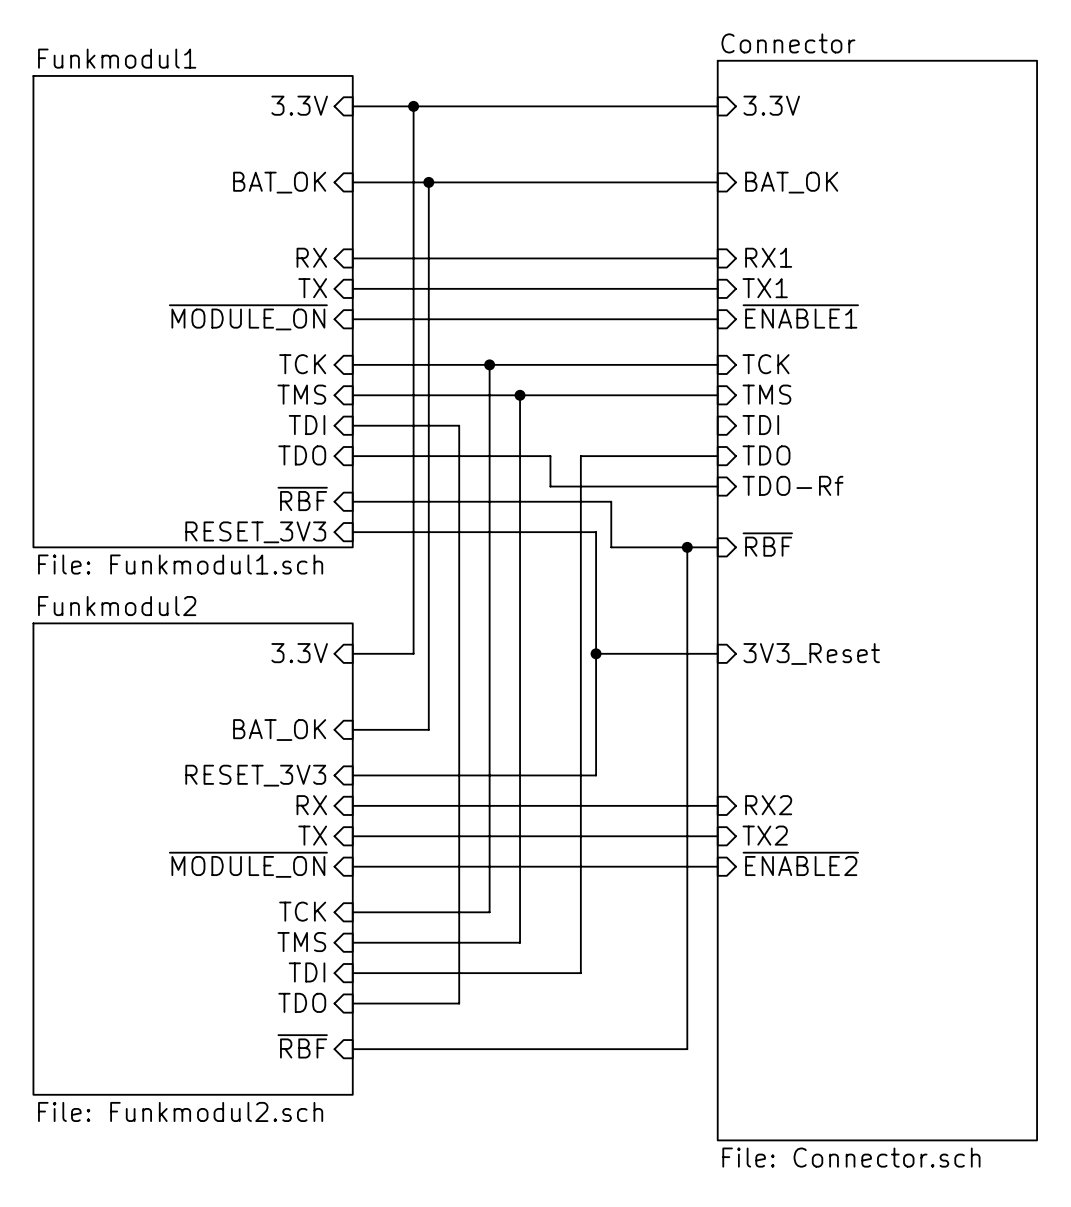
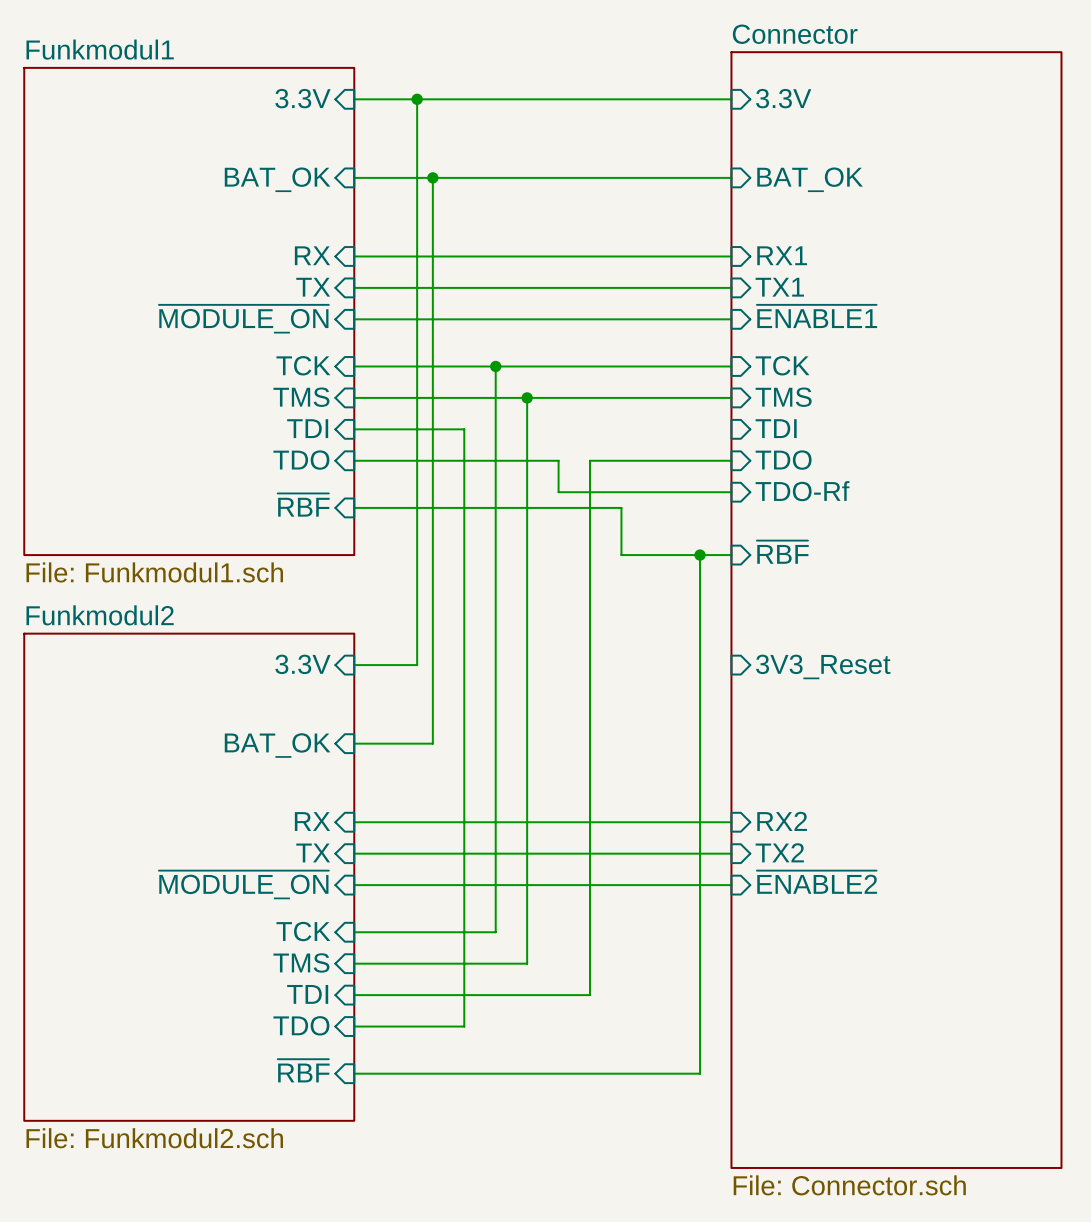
sheet pin: RESET_3V3 (255, 532) -> none
wire: (352, 532) (596, 532) (596, 775) (352, 775) -> none
wire: (596, 653) (717, 653) -> none
junction: (596, 653) -> none
sheet pin: RESET_3V3 (255, 775) -> none

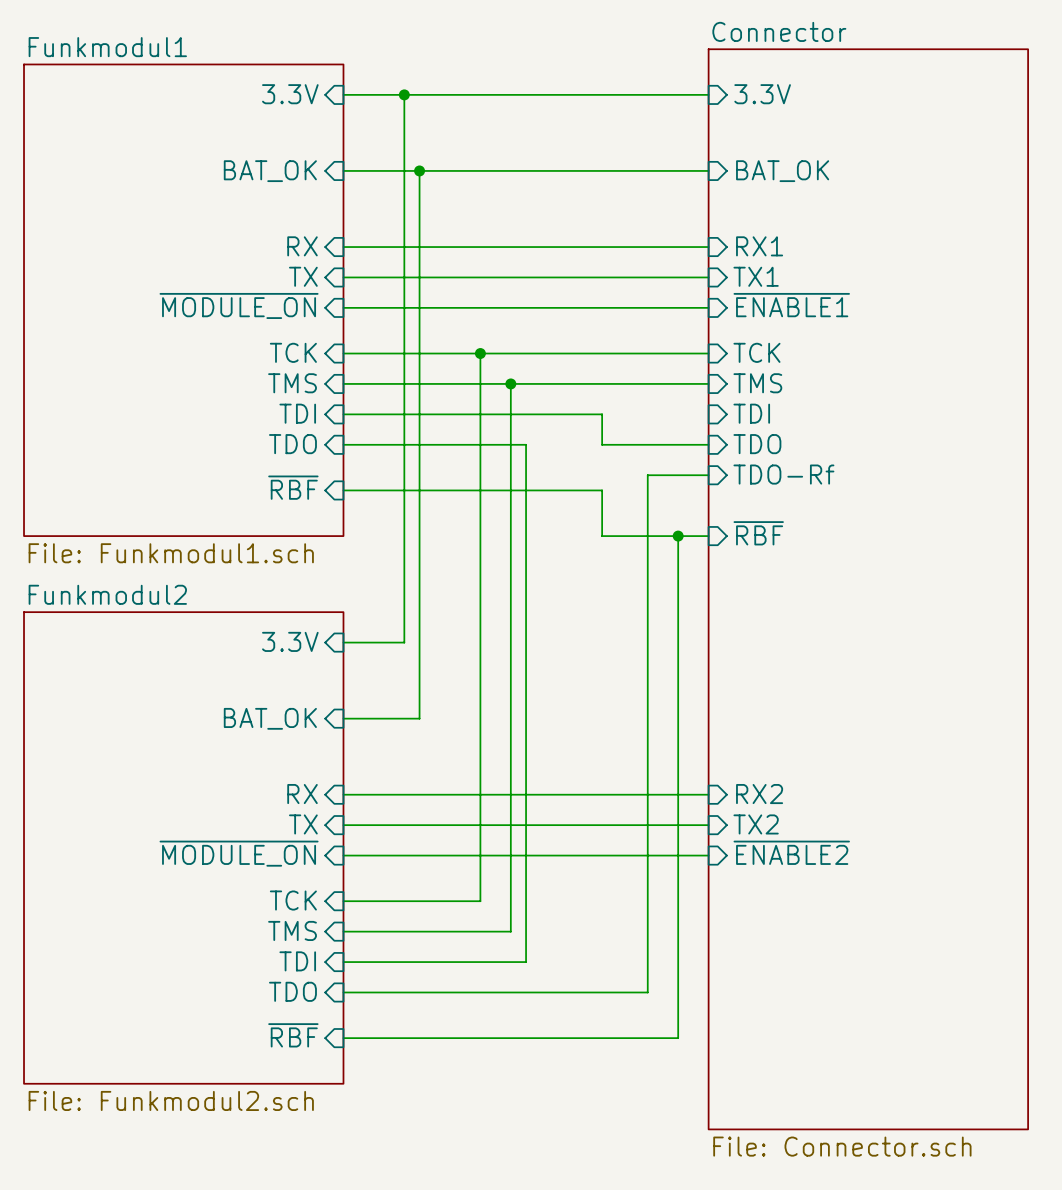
wire: (464, 429) (464, 1026) -> (647, 475) (647, 992) (449, 992)
wire: none -> (449, 414) (602, 414) (602, 444)
wire: (542, 460) (558, 460) (558, 492) (668, 492) -> none
wire: (621, 460) (590, 460) (590, 995) (542, 995) -> (526, 444) (526, 962)
sheet pin: 3V3_Reset (823, 666) -> none

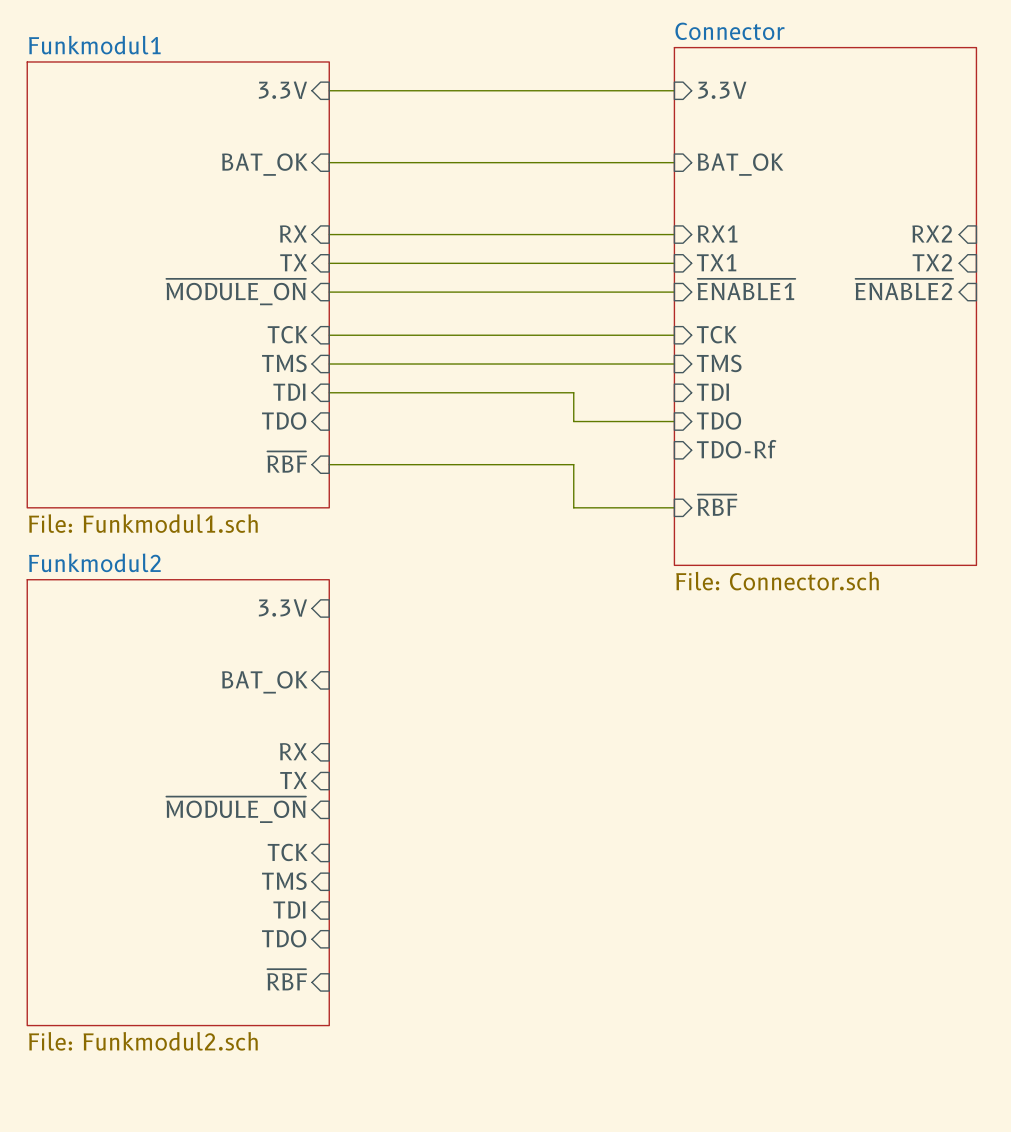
wire: (404, 94) (404, 642) (343, 642) -> none
junction: (404, 94) -> none
wire: (419, 170) (419, 718) (343, 718) -> none
junction: (419, 170) -> none
sheet pin: none -> RX2 (932, 233)
sheet pin: none -> TX2 (932, 262)
sheet pin: none -> ~{ENABLE2} (904, 289)
sheet Connector: none -> File: Connector.sch (825, 306)
wire: (480, 353) (480, 901) (343, 901) -> none
junction: (480, 353) -> none
wire: (510, 383) (510, 931) (343, 931) -> none
junction: (510, 383) -> none
wire: (343, 444) (526, 444) (526, 962) (343, 962) -> none
wire: (708, 475) (647, 475) (647, 992) (343, 992) -> none
wire: (678, 536) (678, 1038) (343, 1038) -> none
junction: (678, 536) -> none
sheet Connector: File: Connector.sch (868, 589) -> none
wire: (343, 794) (708, 794) -> none
sheet pin: RX2 (759, 794) -> none
sheet pin: TX2 (756, 824) -> none
wire: (343, 825) (708, 825) -> none
sheet pin: ~{ENABLE2} (791, 852) -> none
wire: (343, 855) (708, 855) -> none

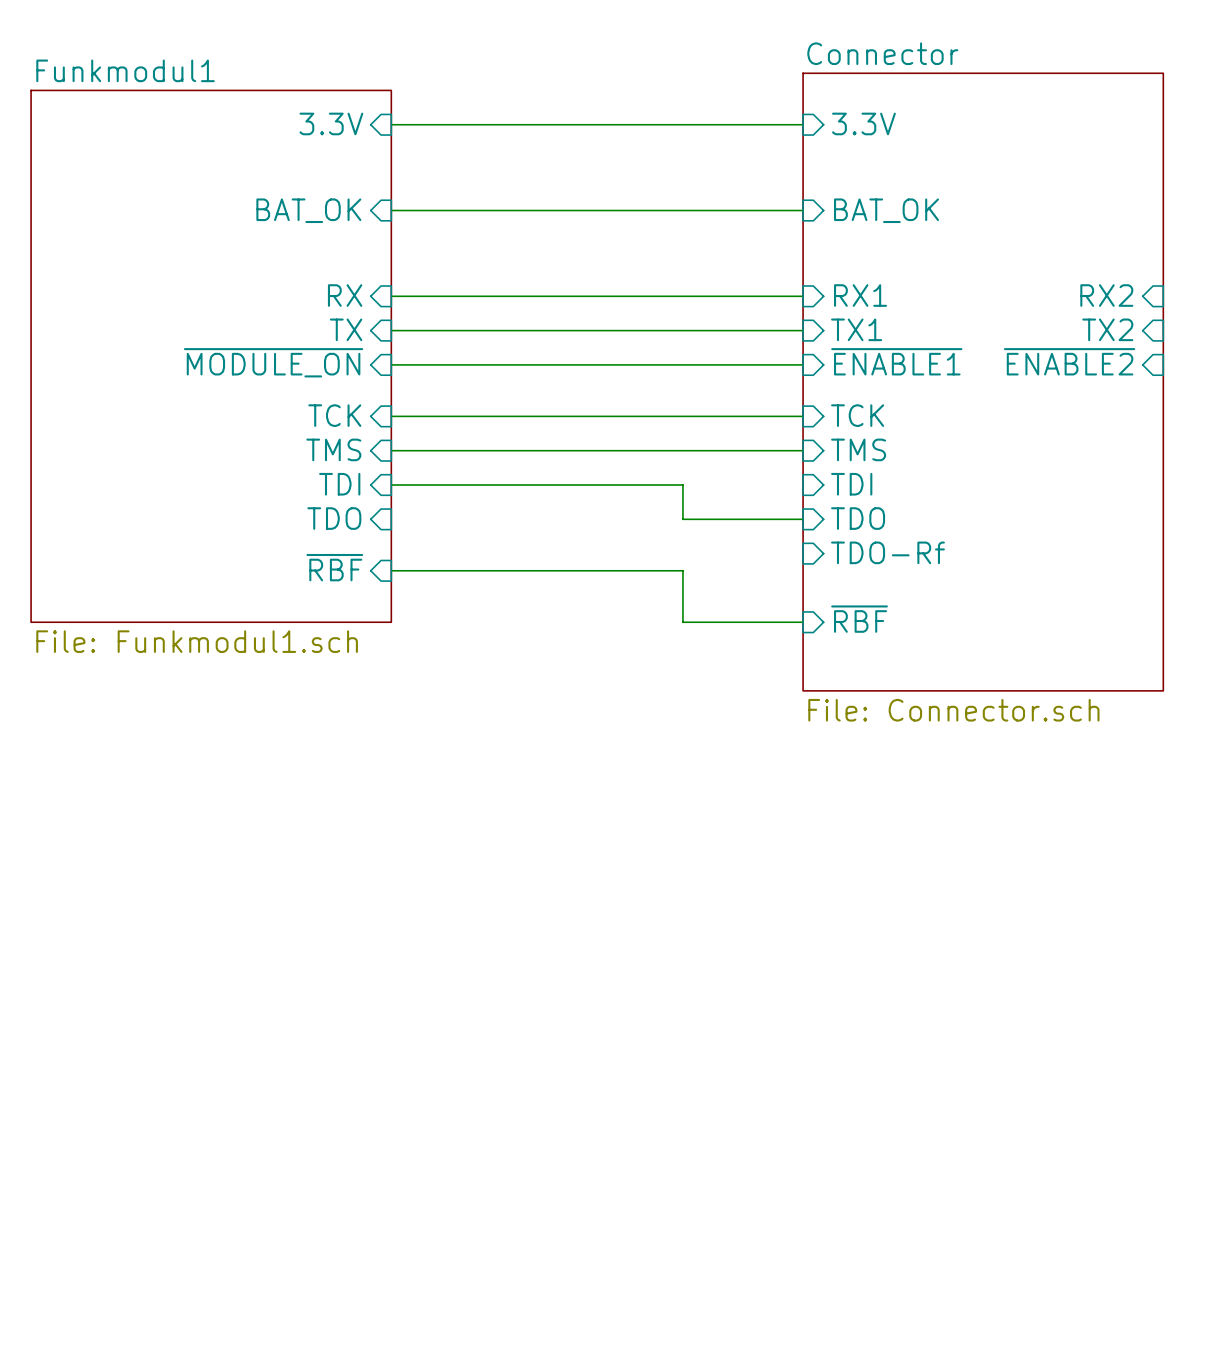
sheet pin: 3.3V (282, 607) -> none
sheet pin: BAT_OK (264, 682) -> none
sheet pin: RX (293, 751) -> none
sheet pin: TX (293, 780) -> none
sheet Funkmodul2: File: Funkmodul2.sch (178, 802) -> none
sheet pin: ~{MODULE_ON} (236, 809) -> none
sheet pin: TCK (287, 852) -> none
sheet pin: TMS (284, 881) -> none
sheet pin: TDI (289, 909) -> none
sheet pin: TDO (284, 938) -> none
sheet pin: ~{RBF} (287, 979) -> none

